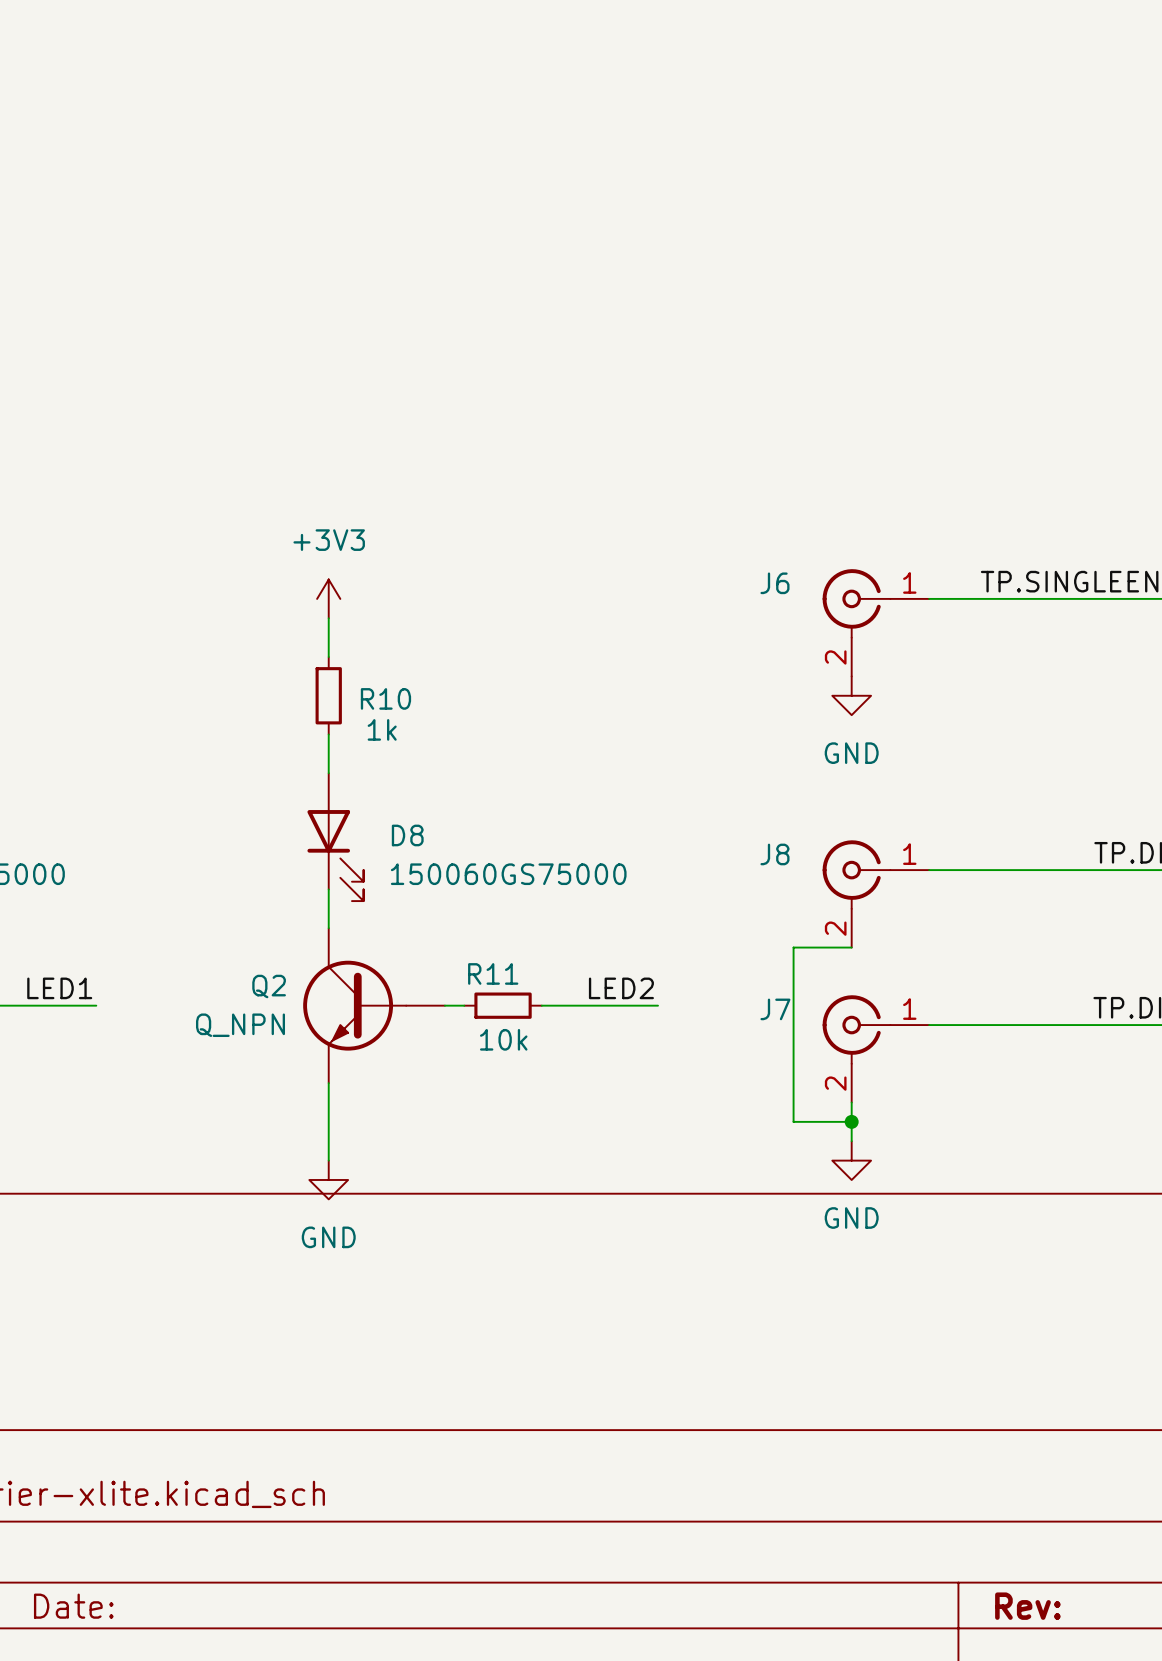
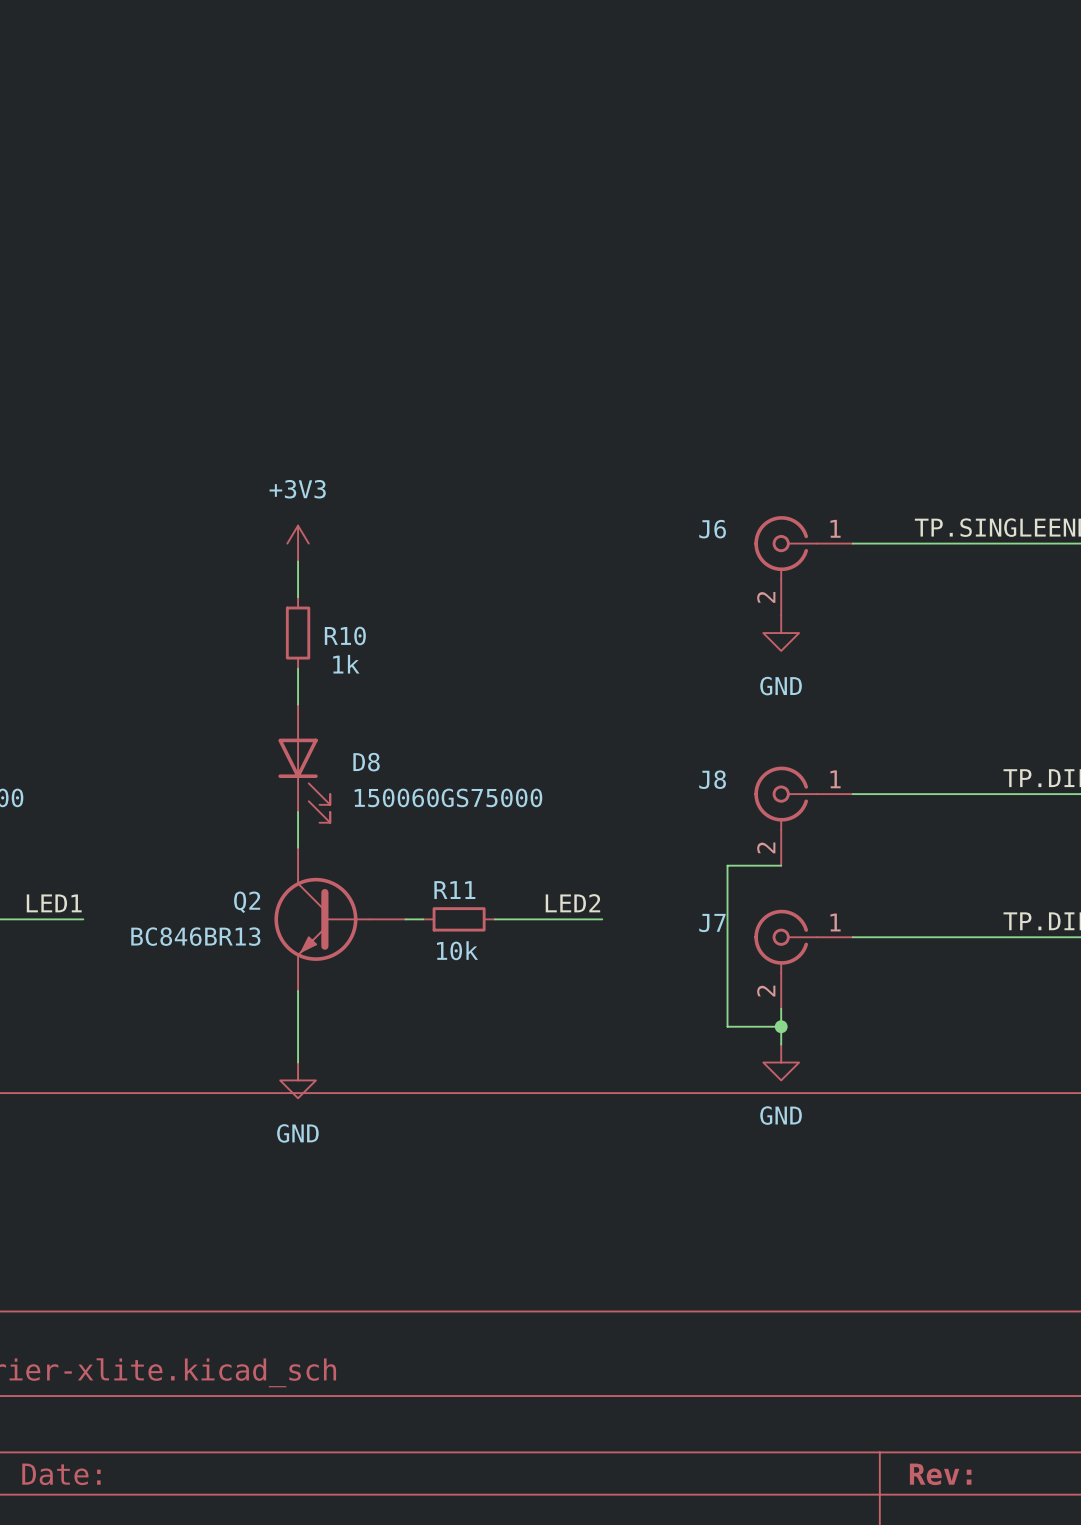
Q2 value: Q_NPN (240, 1025) -> BC846BR13 (195, 936)

